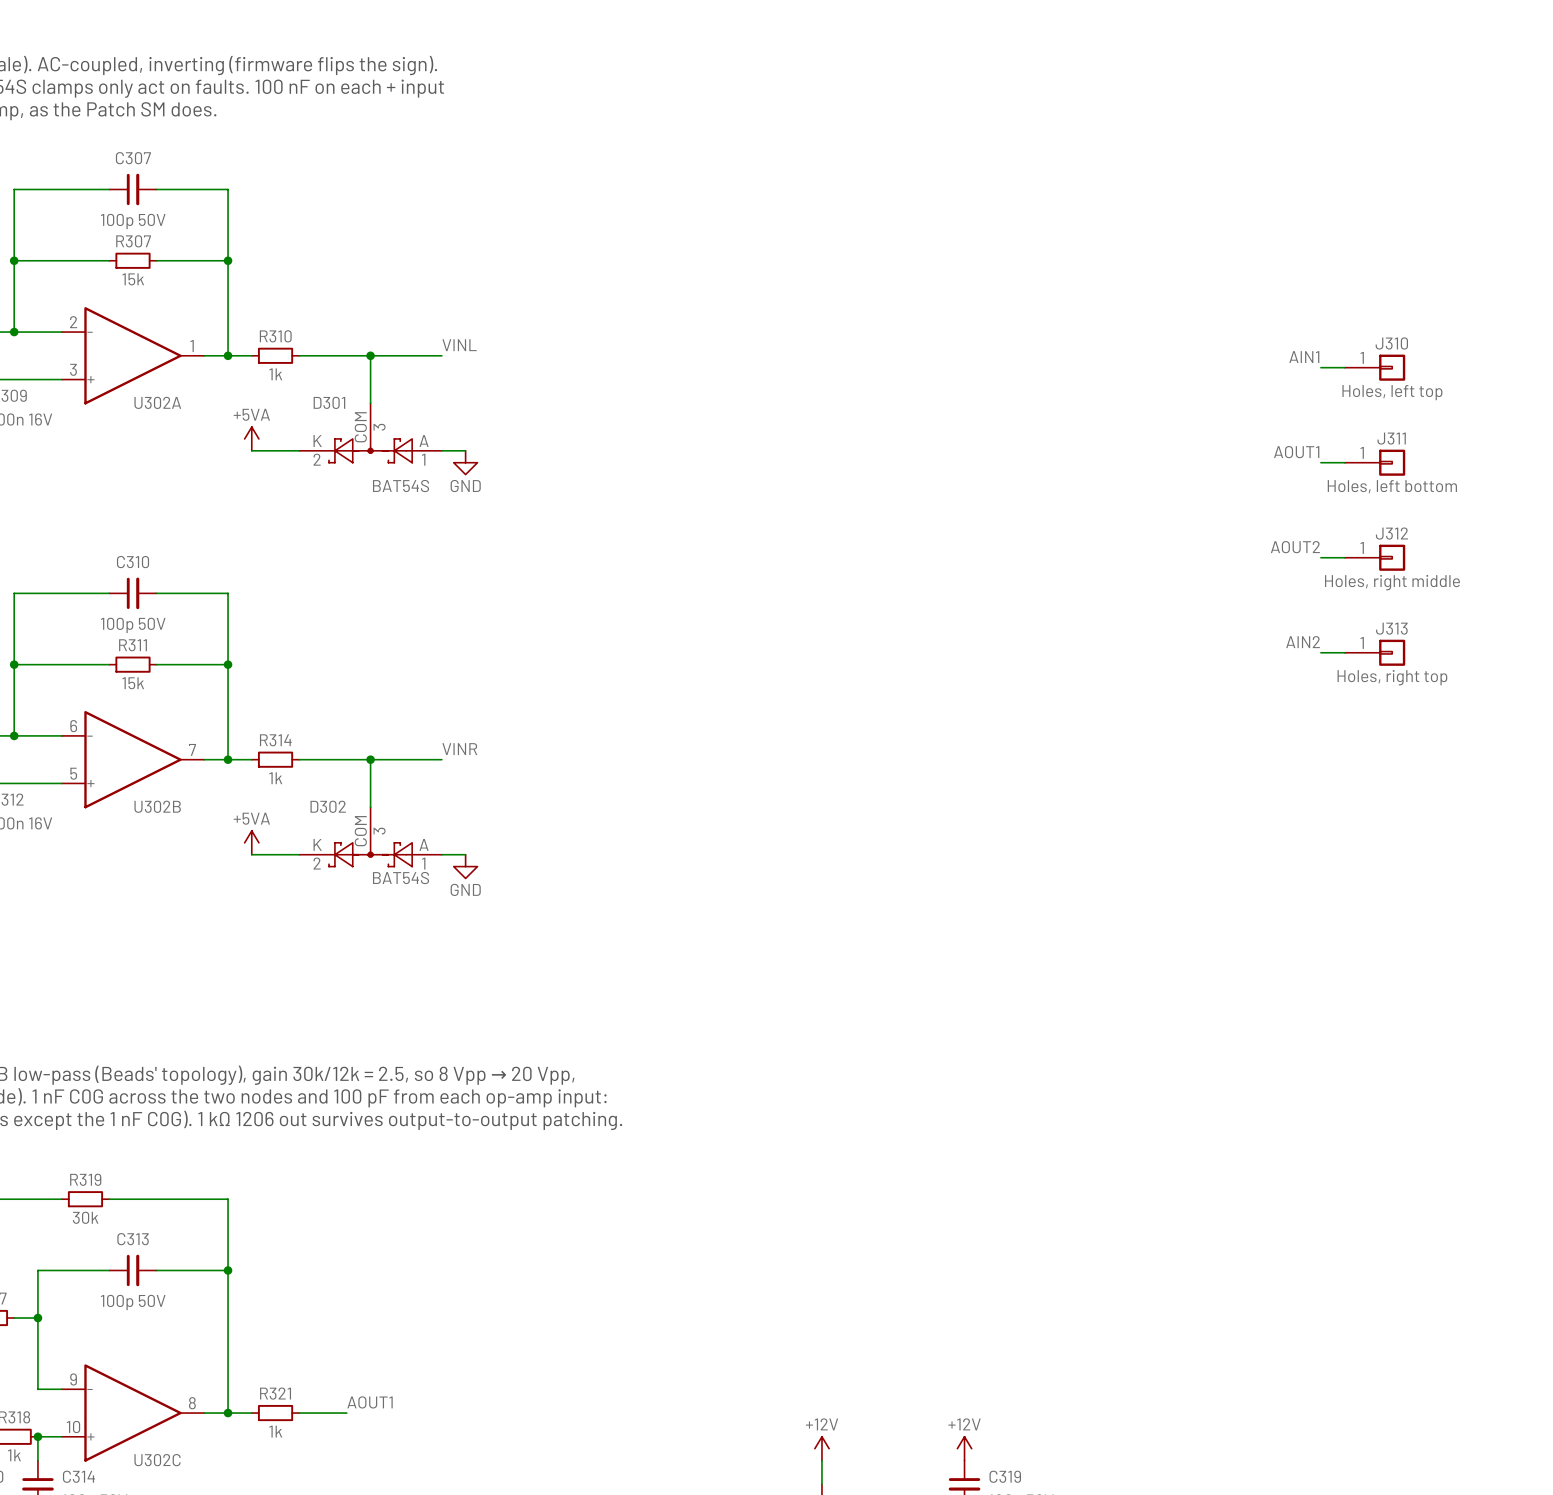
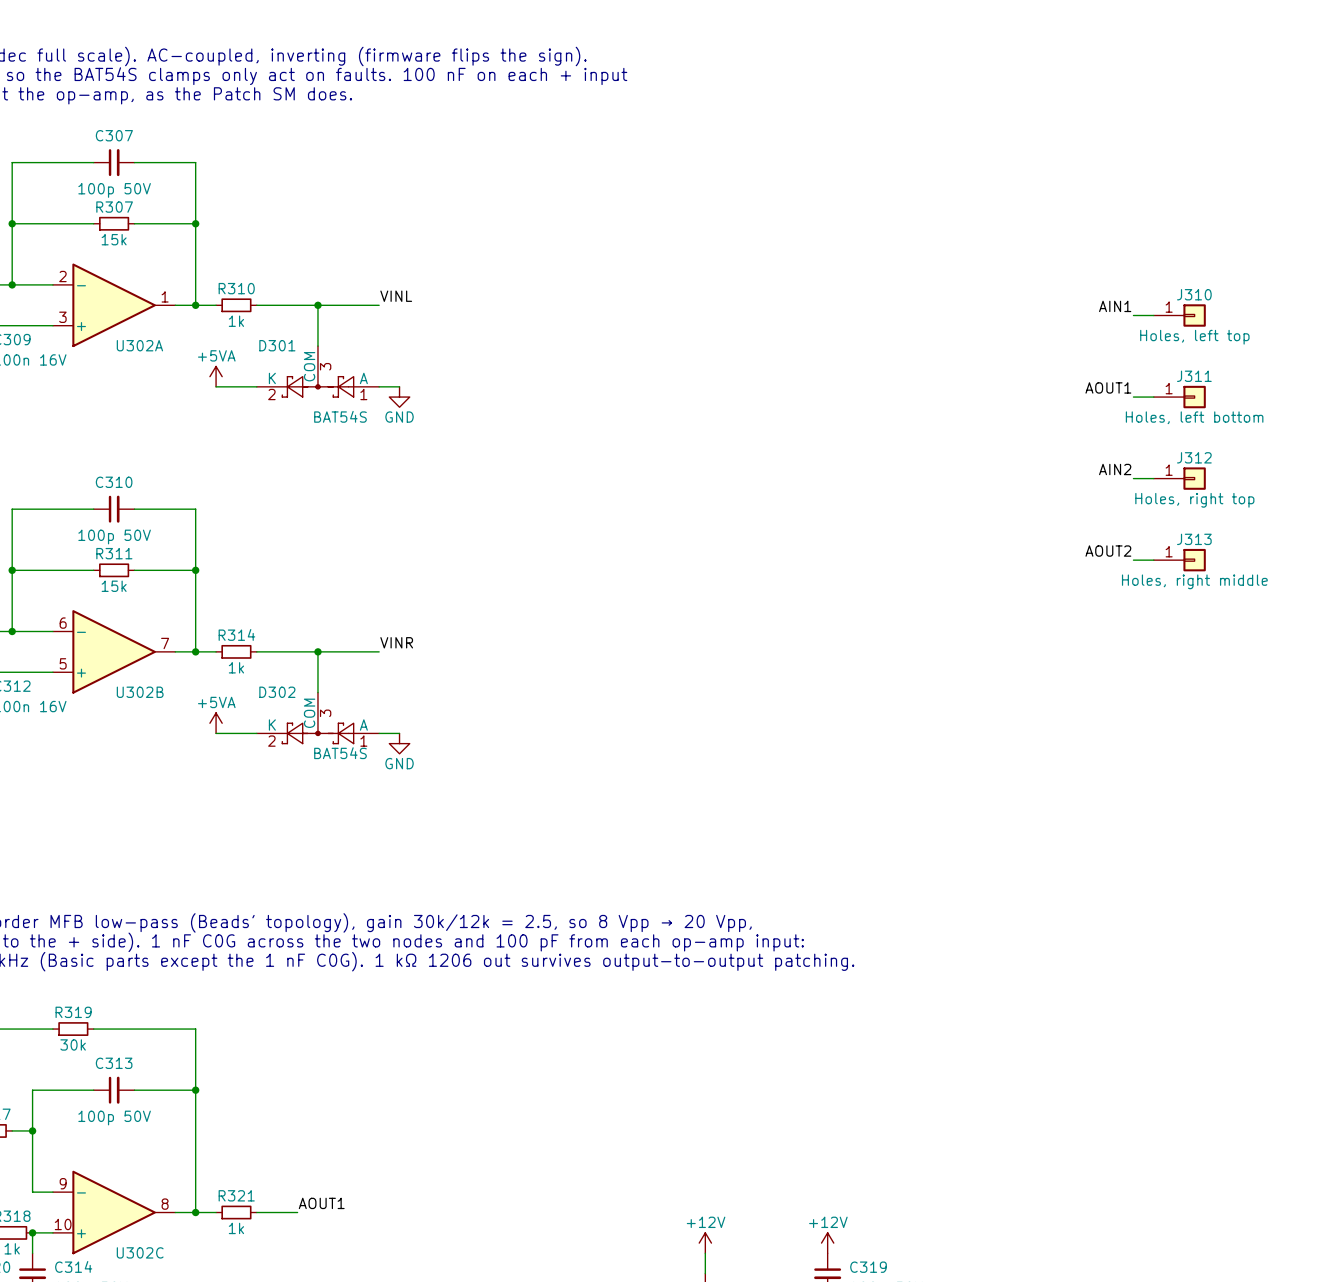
label: AOUT2 (1295, 547) -> AIN2 (1115, 469)
J312 value: Holes, right middle (1392, 582) -> Holes, right top (1194, 500)
label: AIN2 (1303, 642) -> AOUT2 (1108, 551)
J313 value: Holes, right top (1392, 677) -> Holes, right middle (1194, 581)

